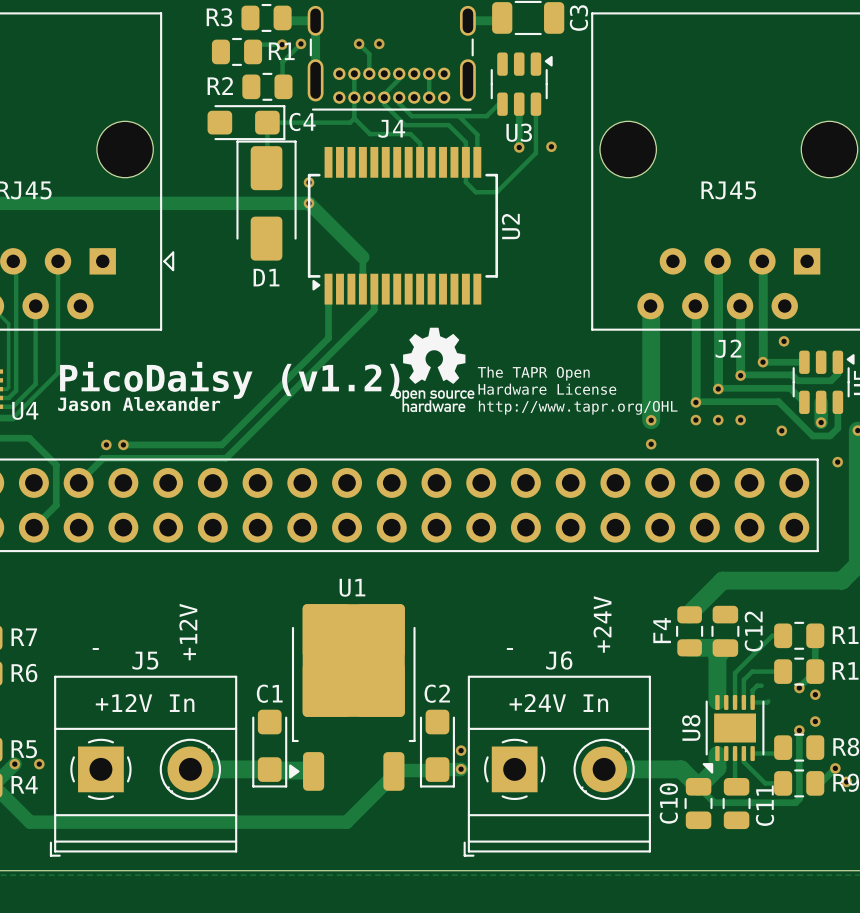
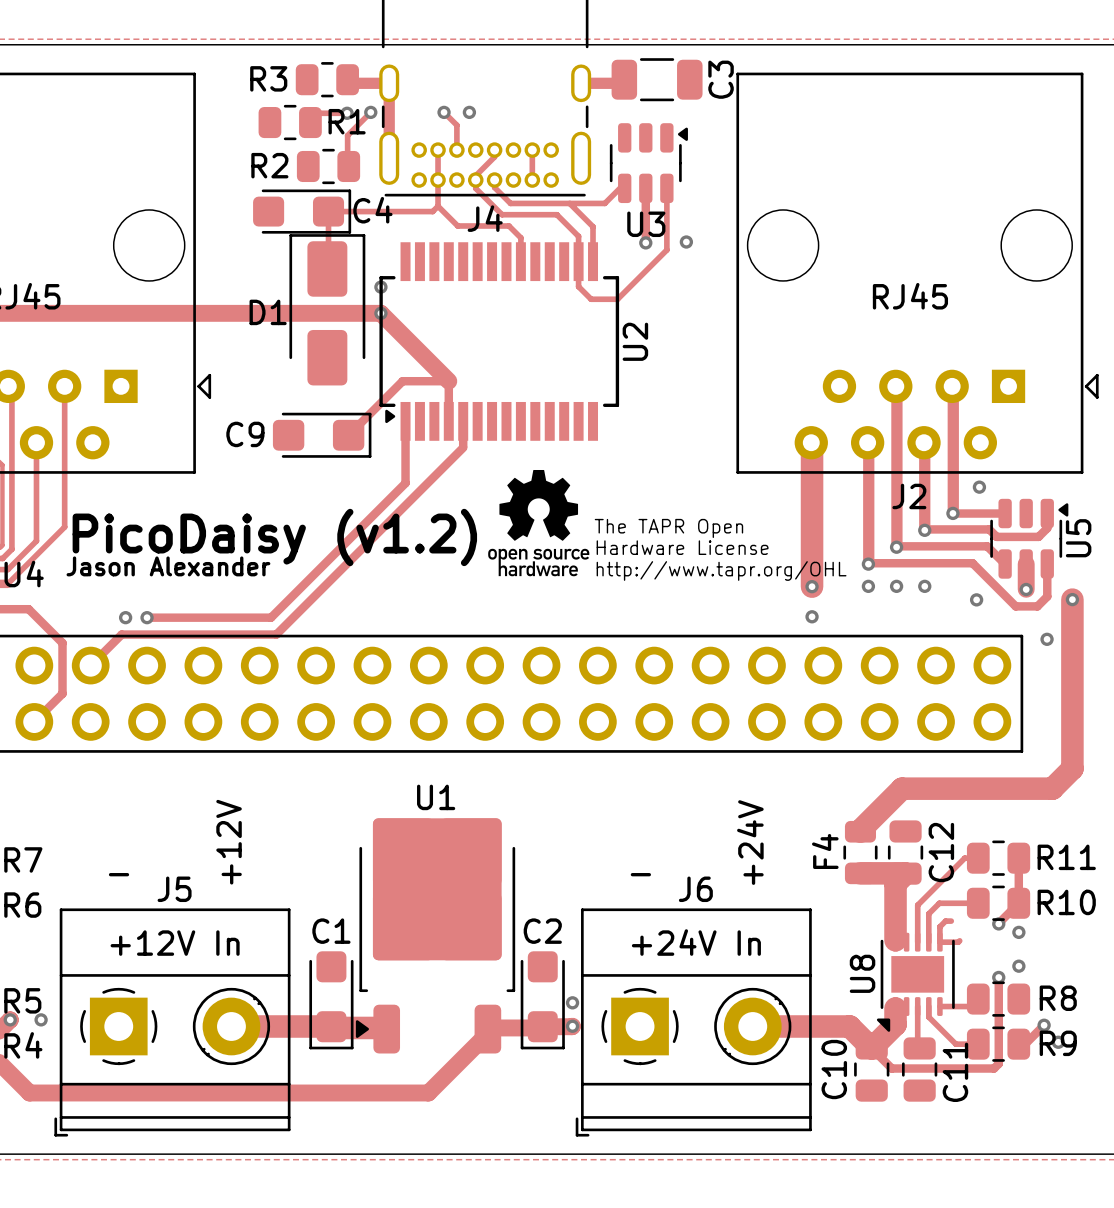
track: none -> (448, 381) (402, 381) (348, 435)
D1 name position: D1 (266, 277) -> D1 (268, 312)
C9: none -> (322, 435)

